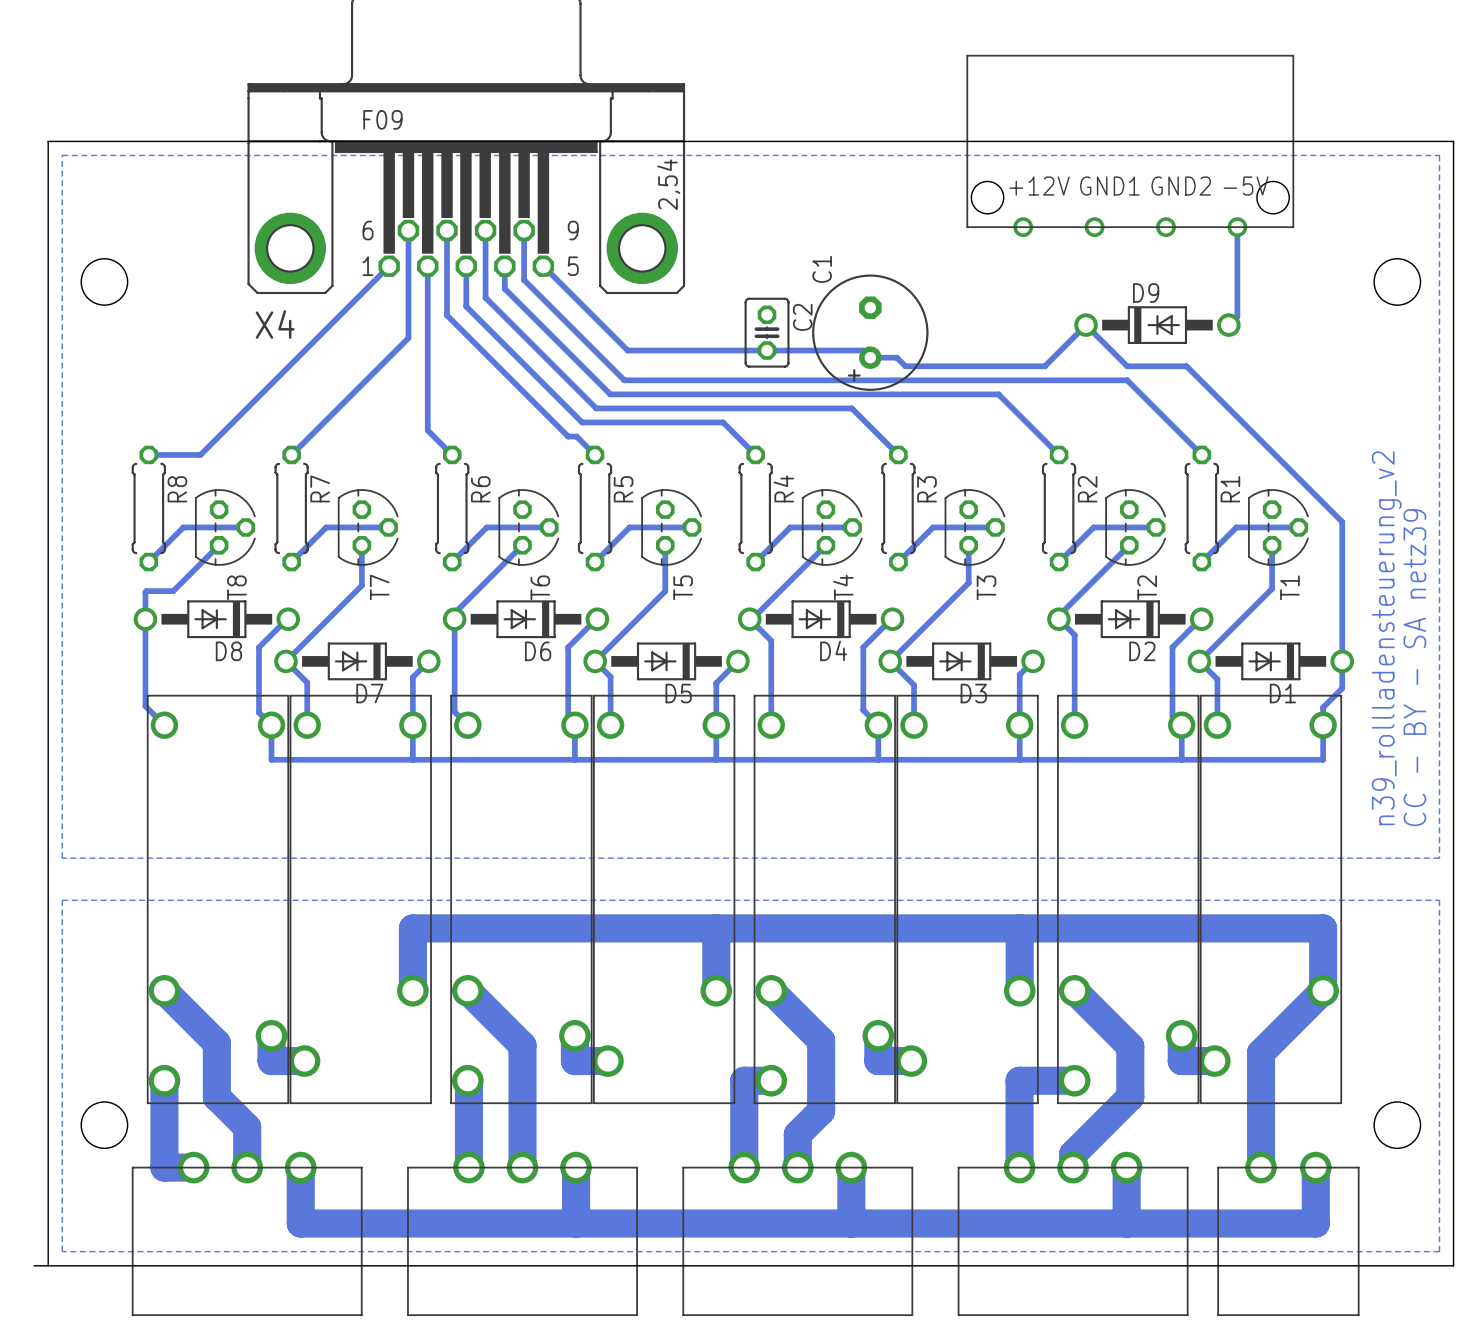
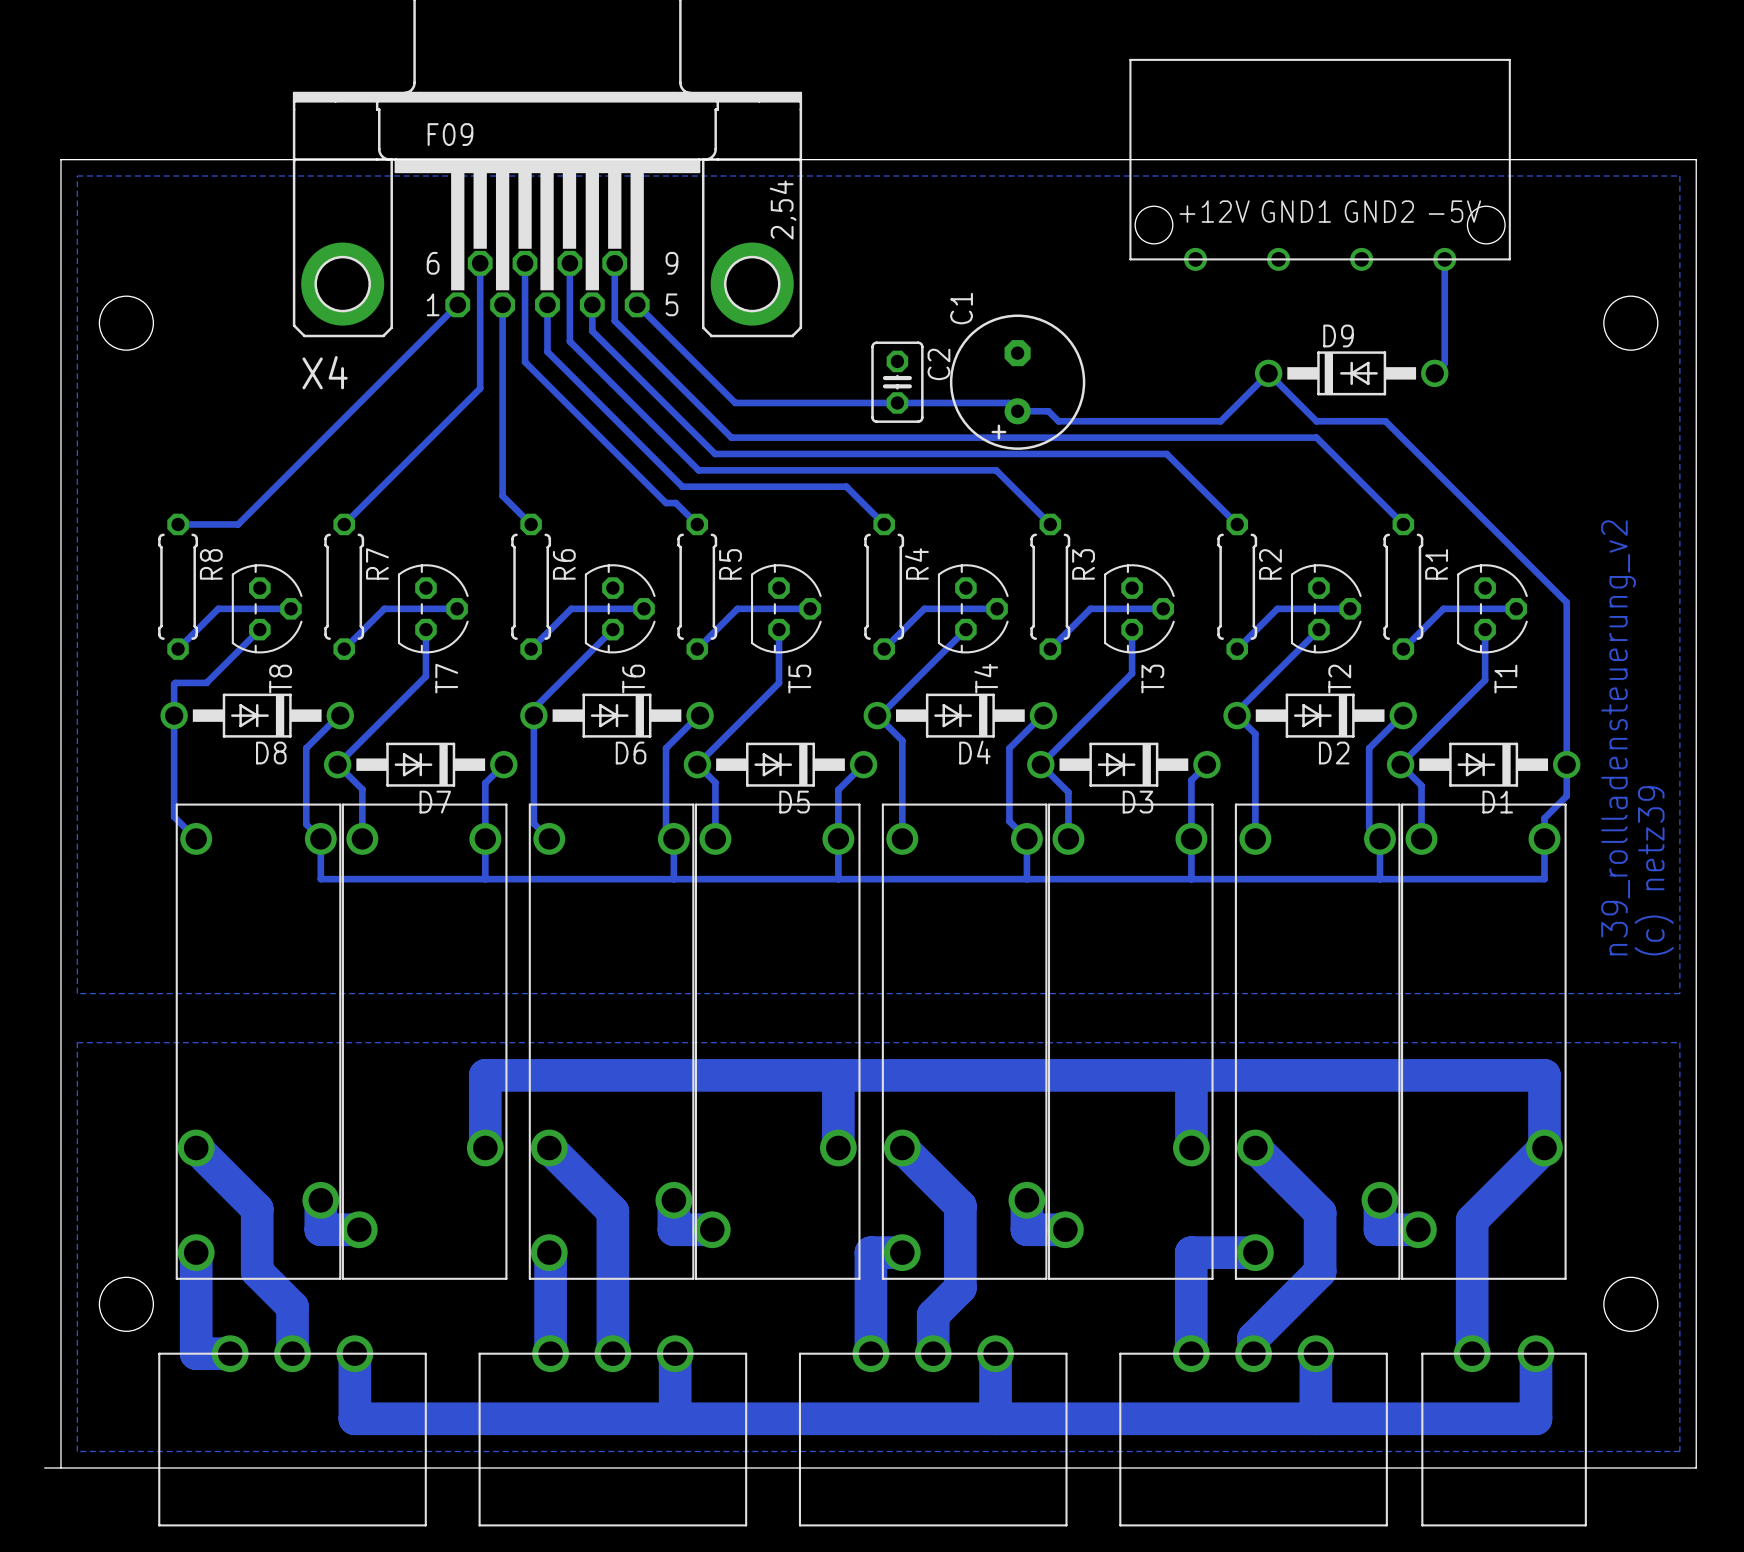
text: CC - BY - SA netz39 (1414, 667) -> (c) netz39 (1654, 870)

